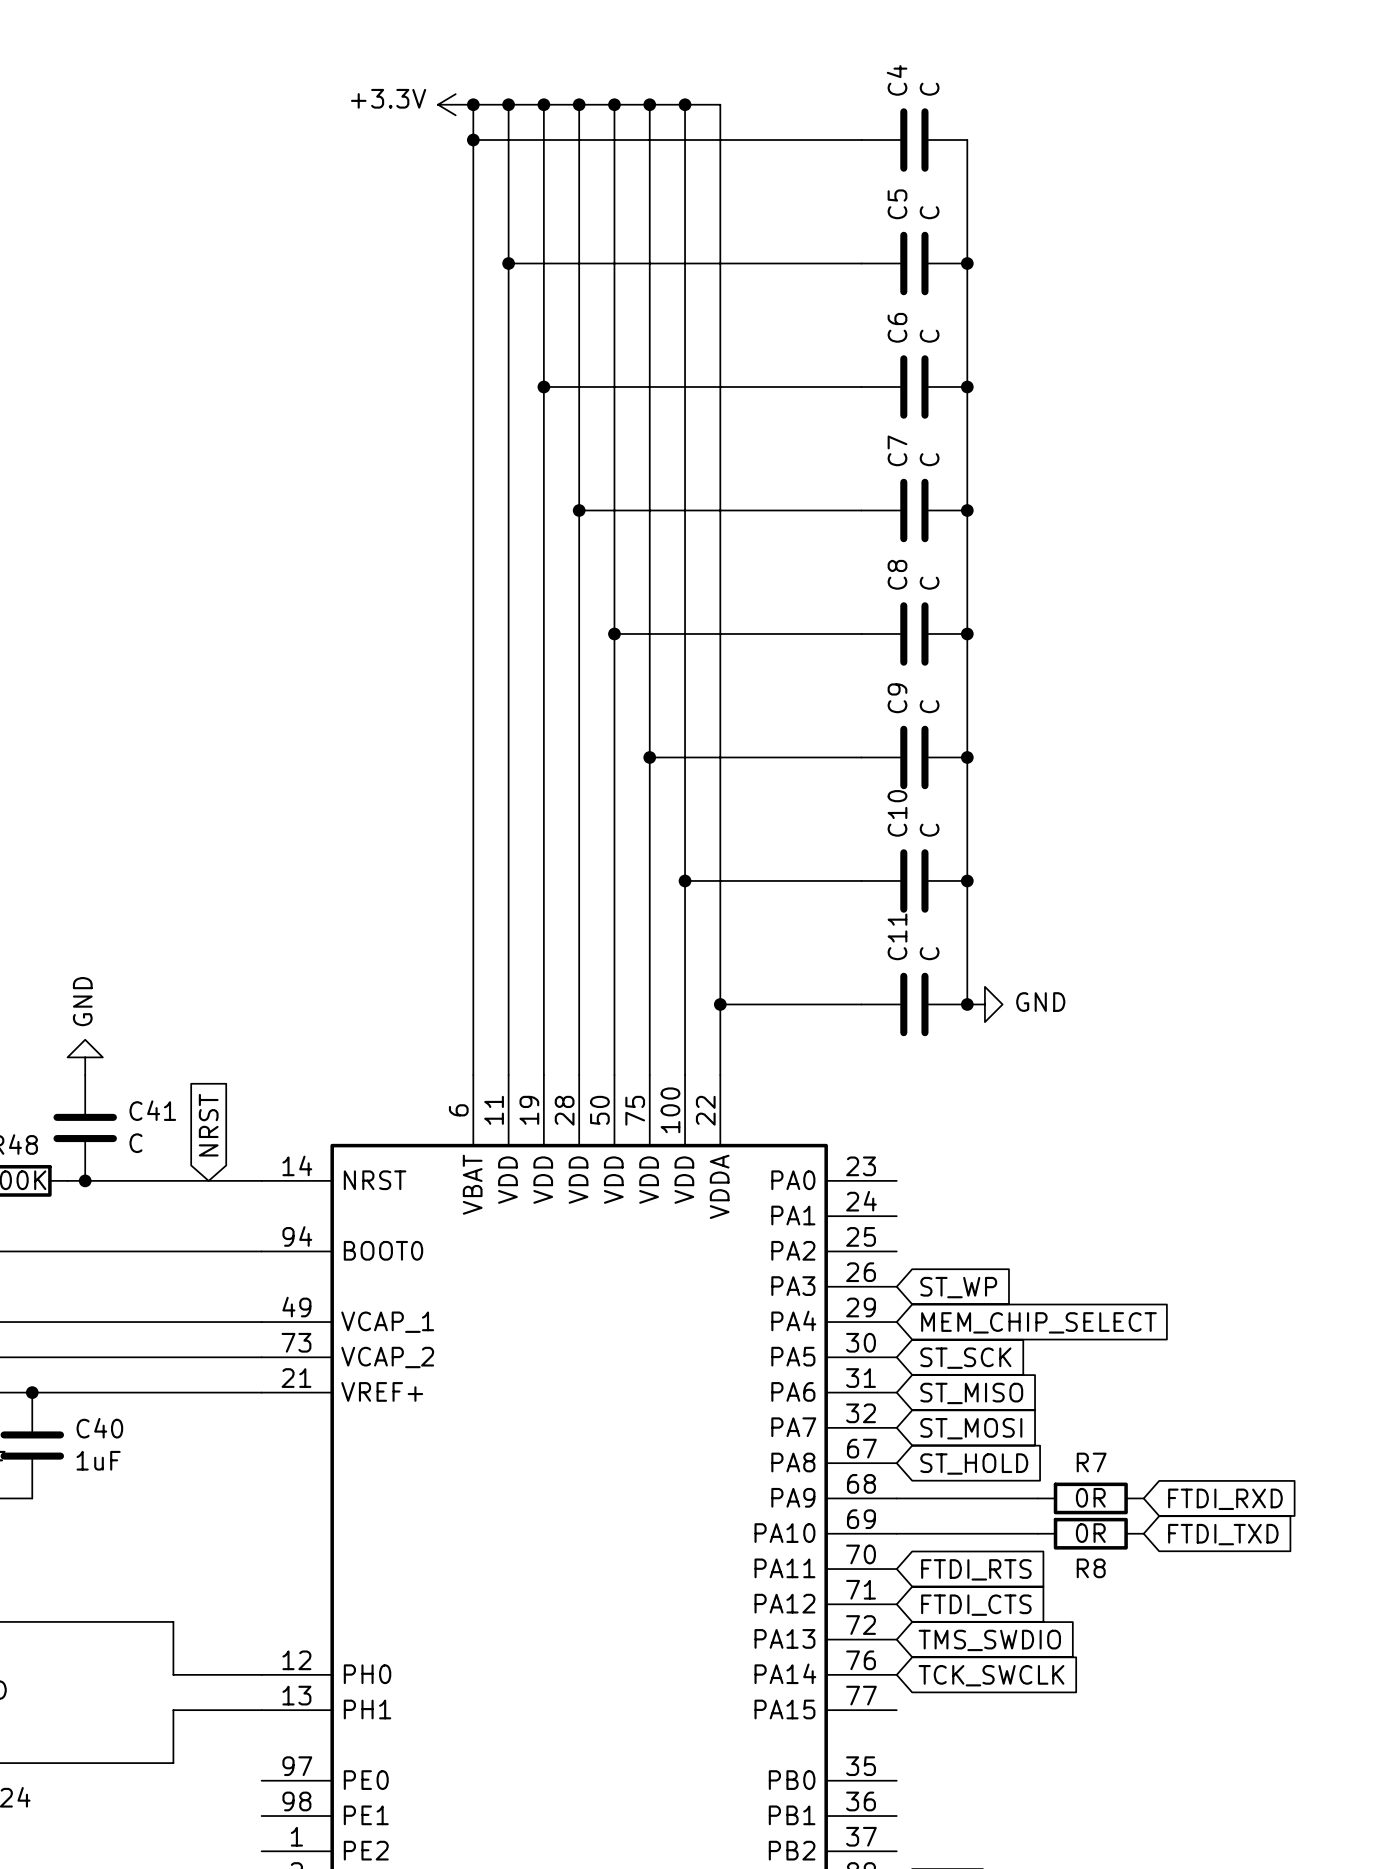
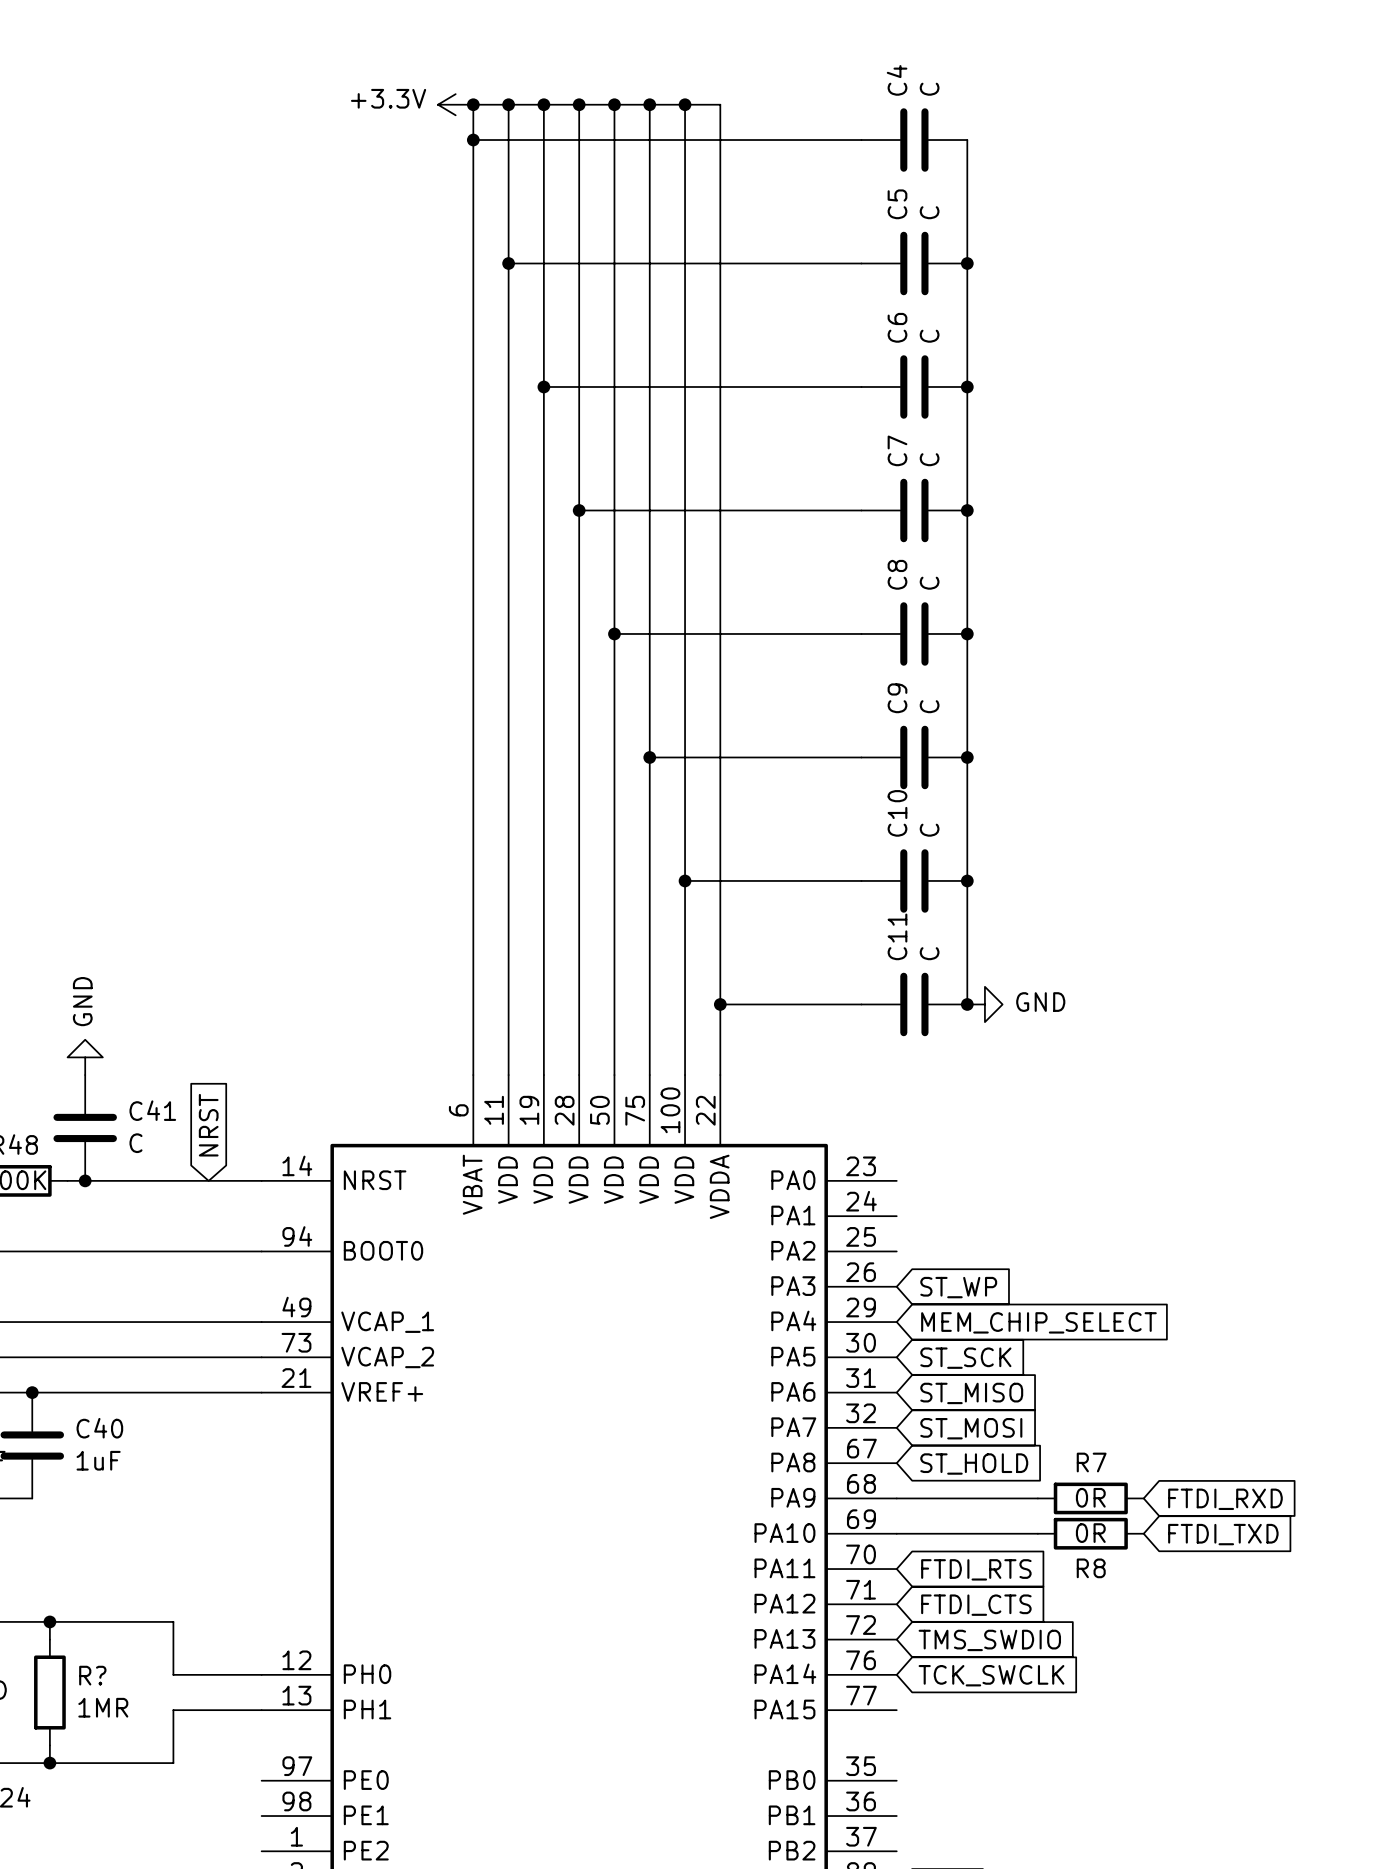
wire: none -> (49, 1621) (49, 1639)
junction: none -> (49, 1621)
R?: none -> 1MR (49, 1692)
wire: none -> (49, 1745) (49, 1763)
junction: none -> (49, 1763)

